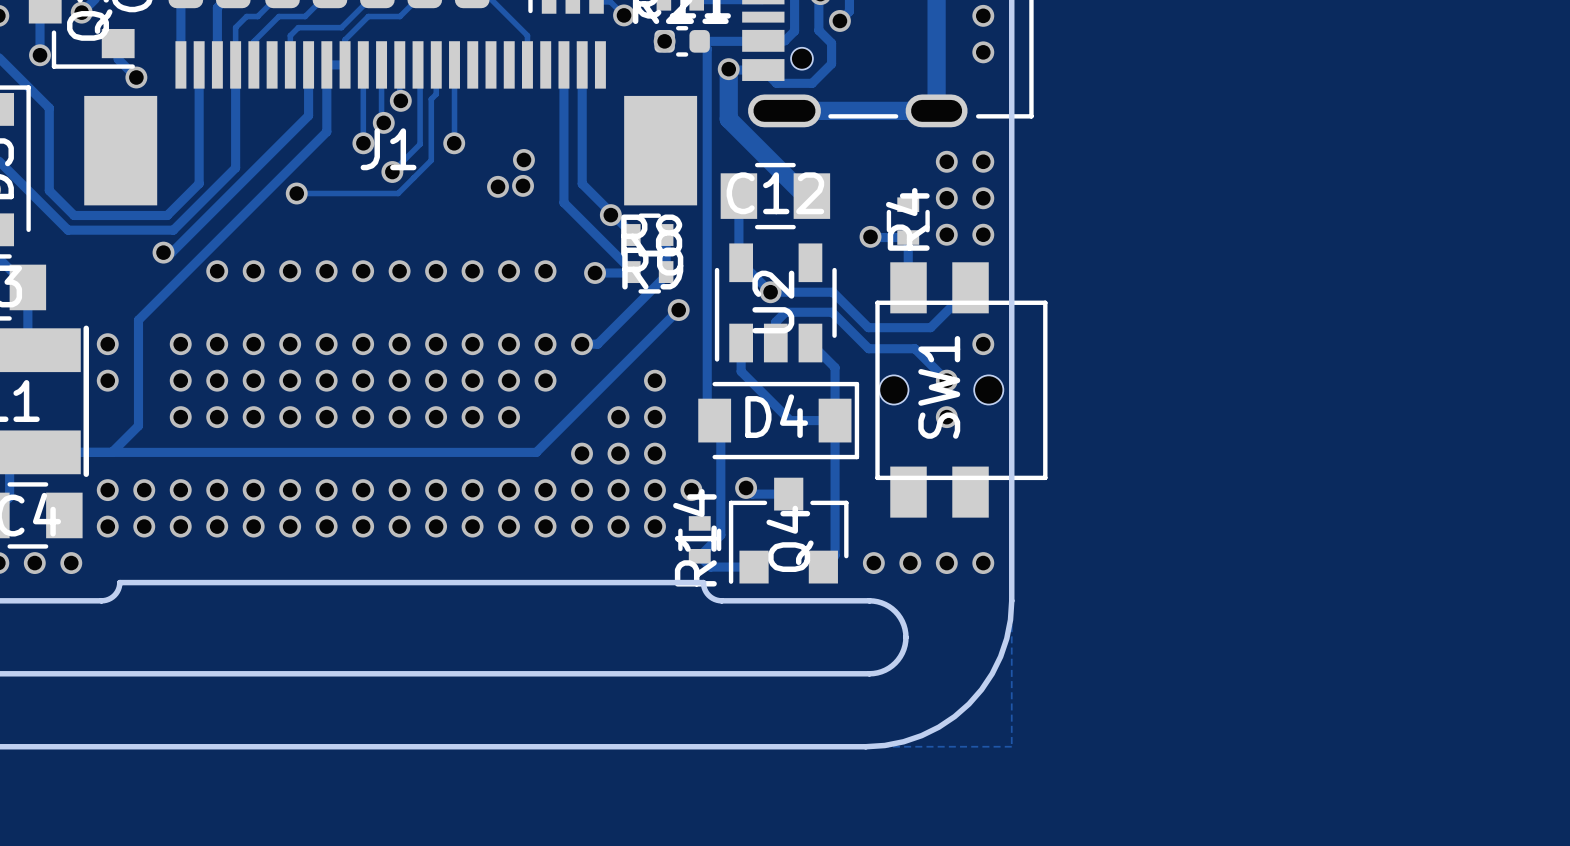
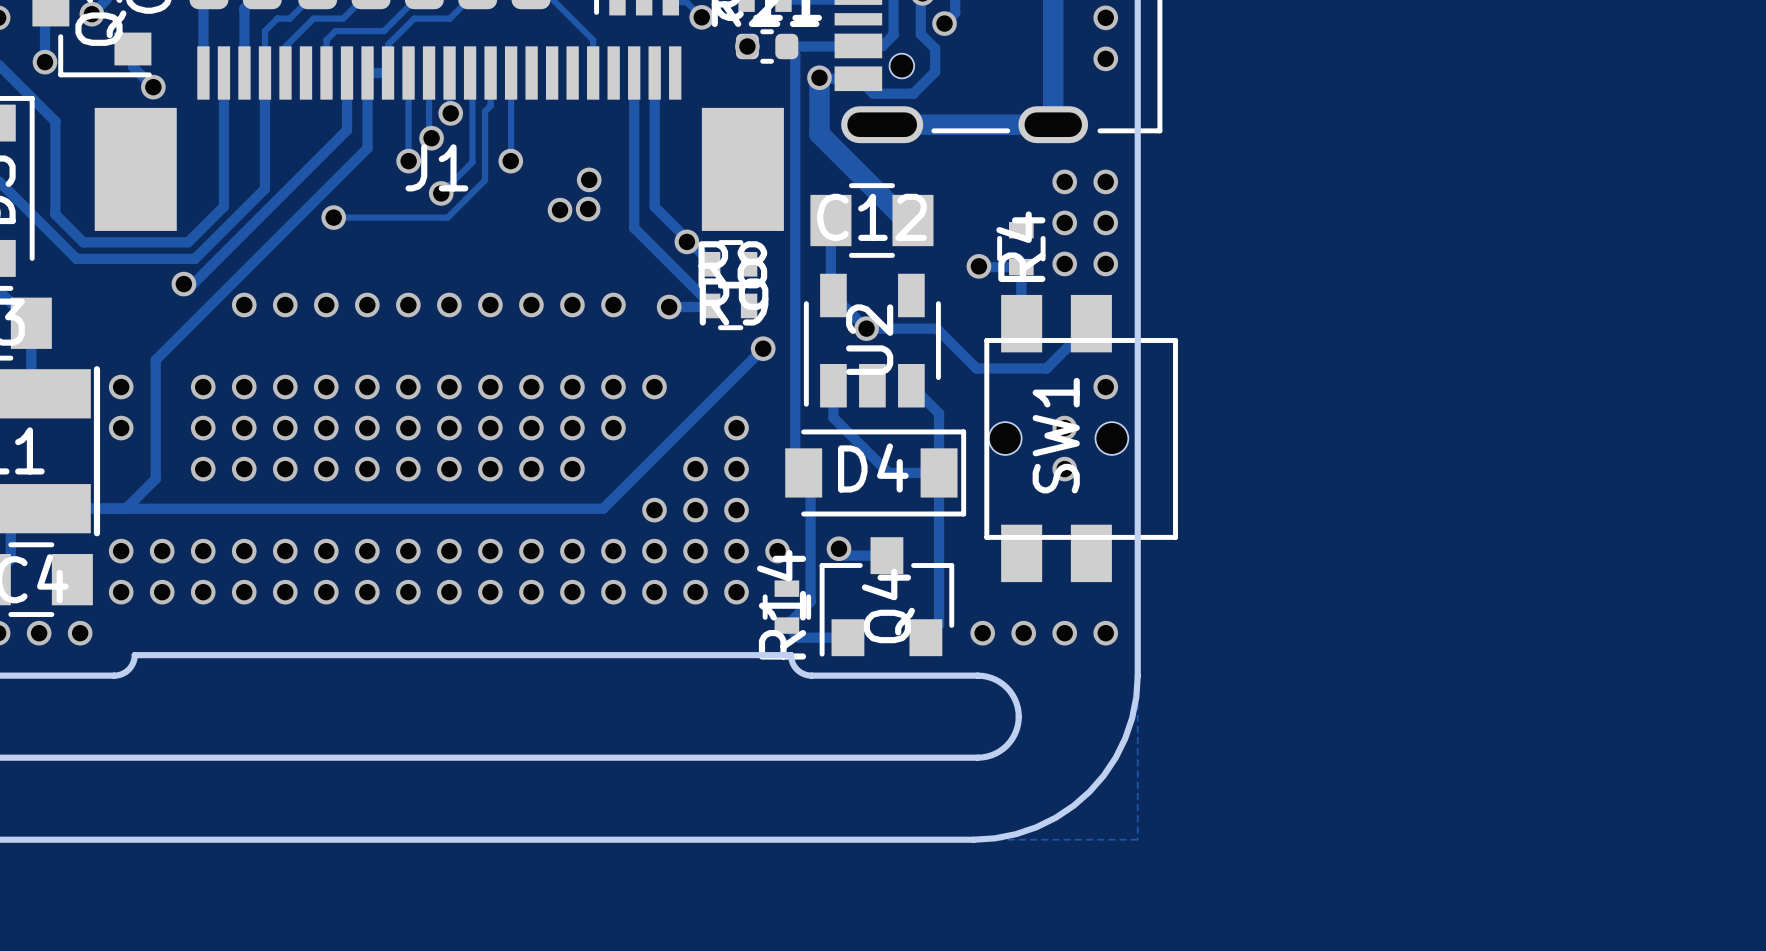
track: (666, 235) (666, 275) (597, 344) (582, 344) -> none
track: (775, 343) (775, 322) (785, 312) (832, 312) (868, 348) (914, 348) (946, 380) -> none

